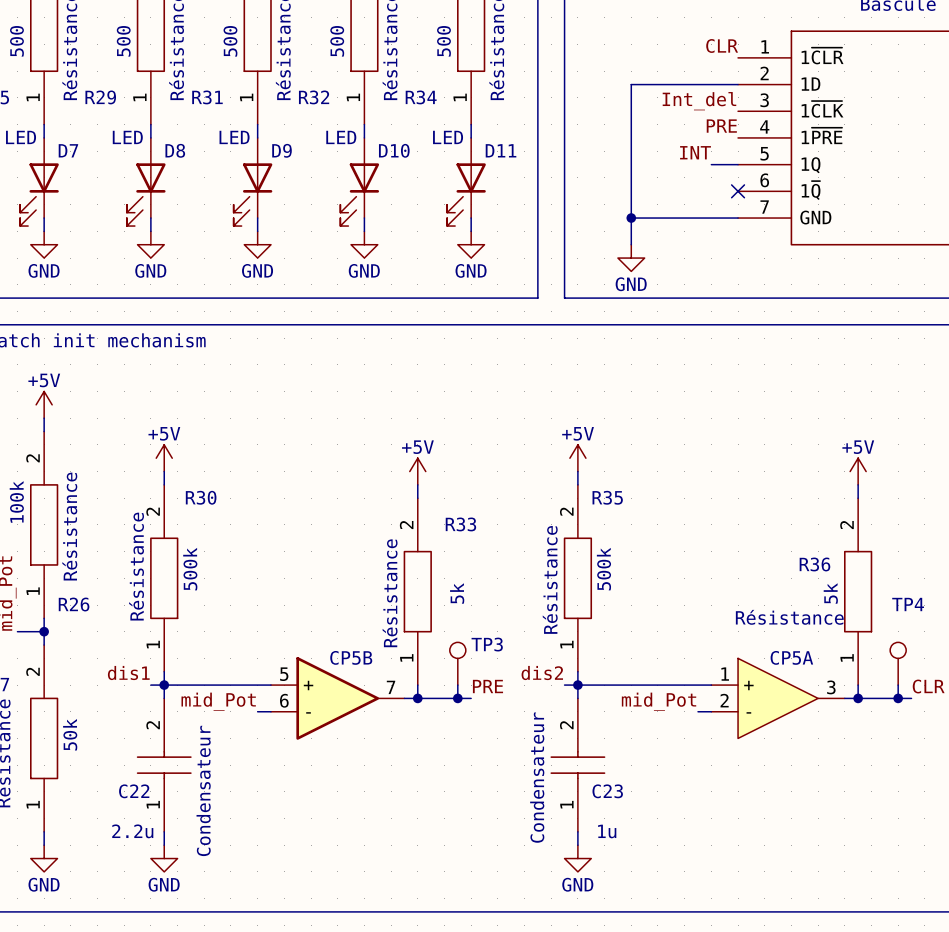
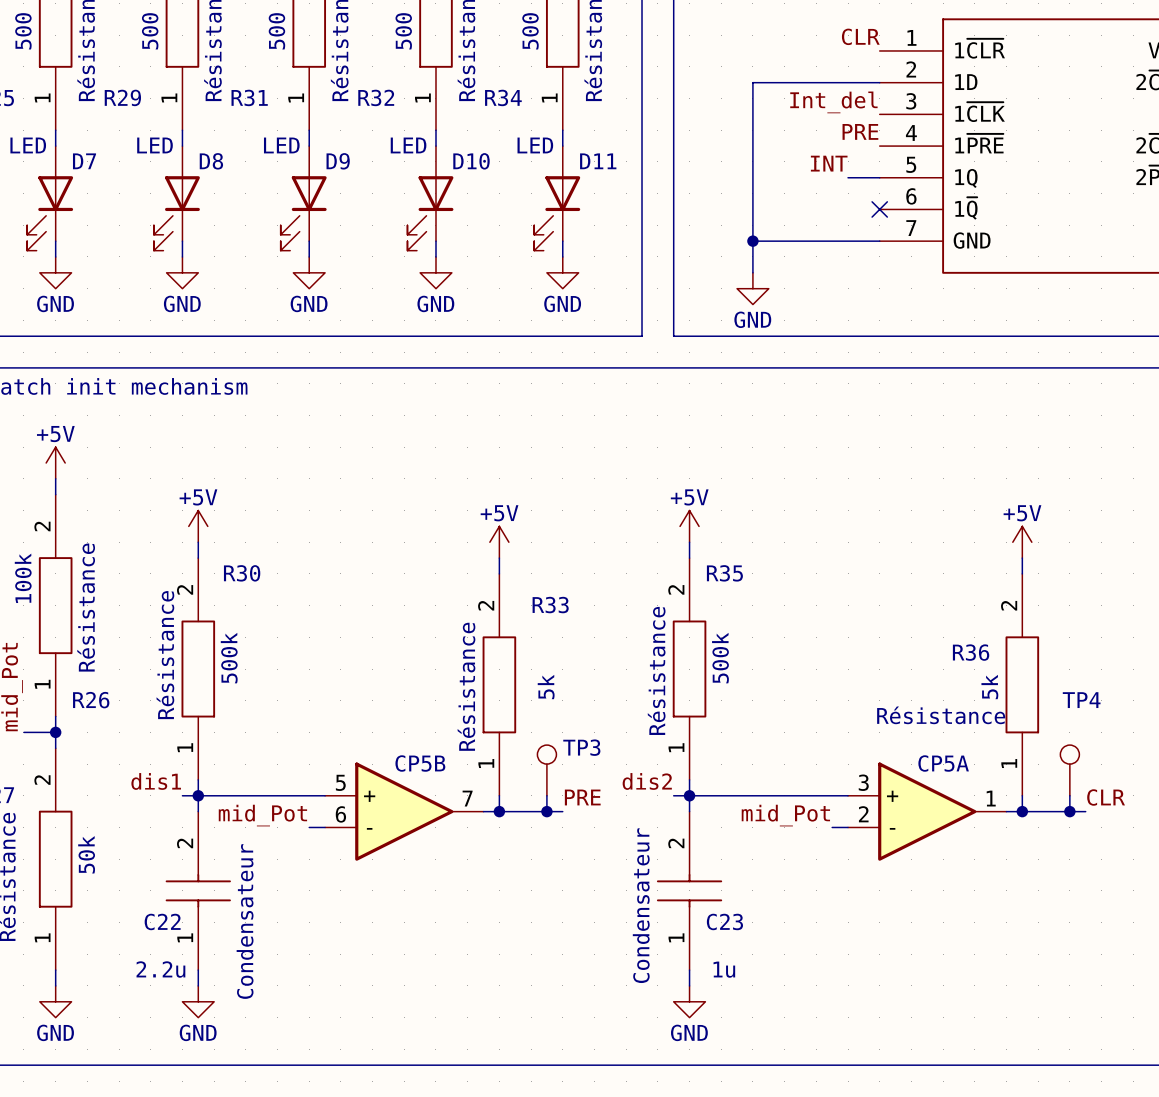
CP5A symbol: [711, 658, 845, 739] -> [848, 762, 1007, 861]

